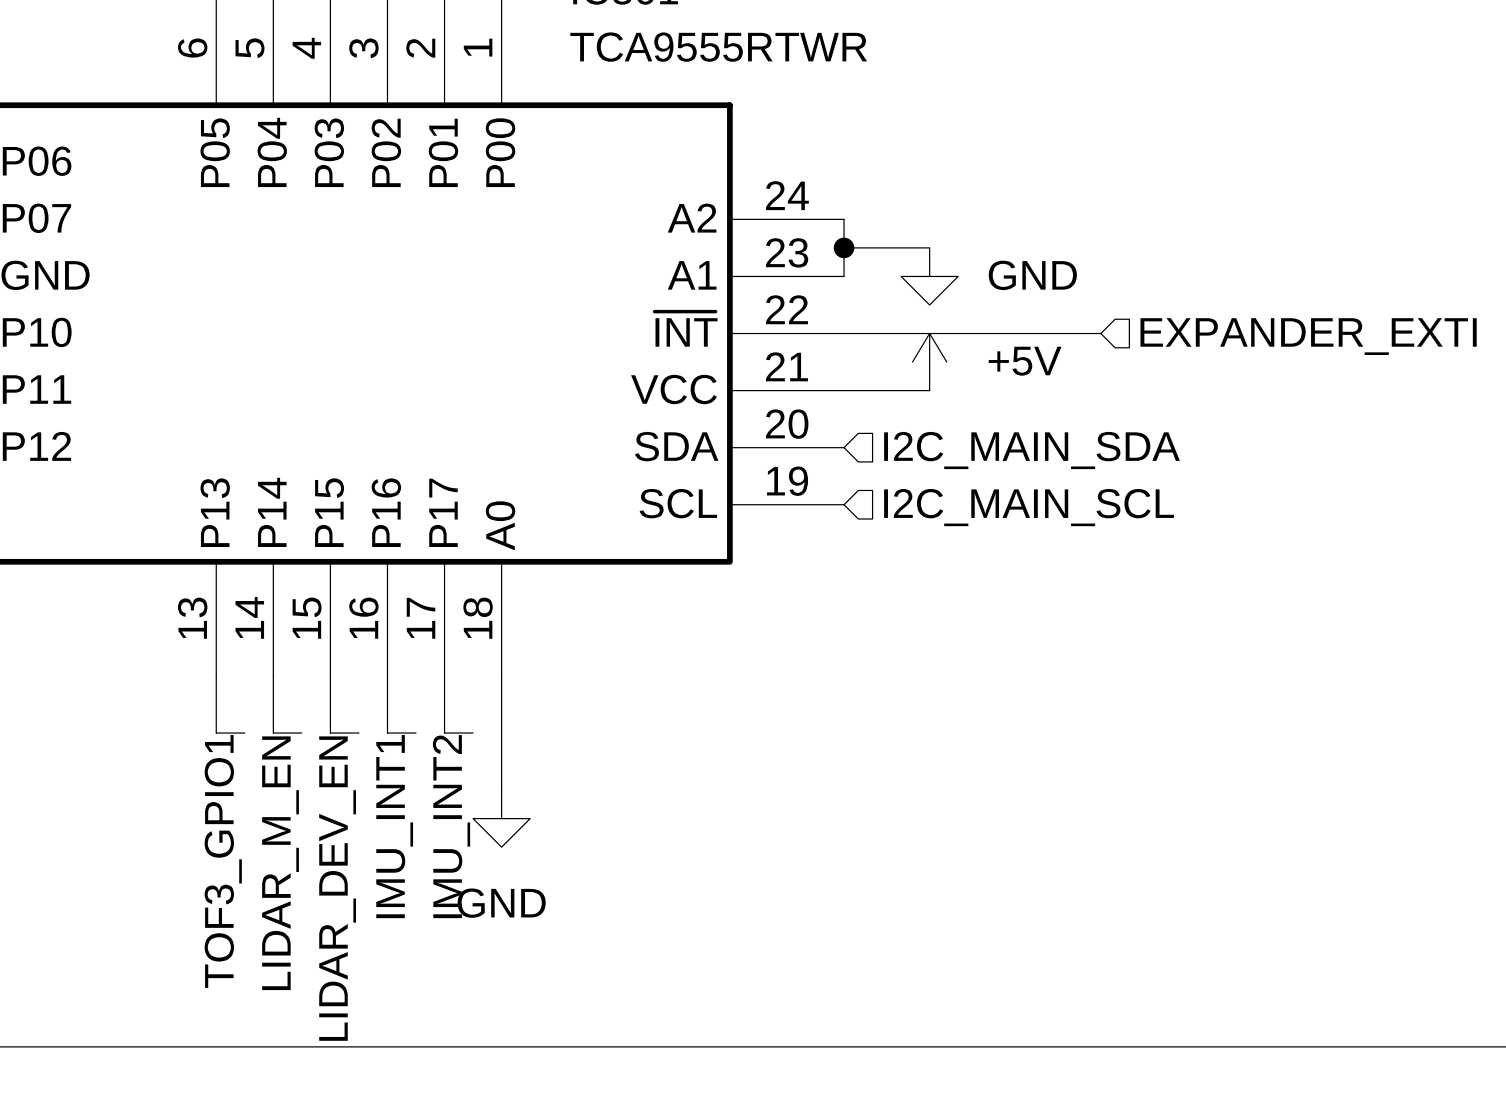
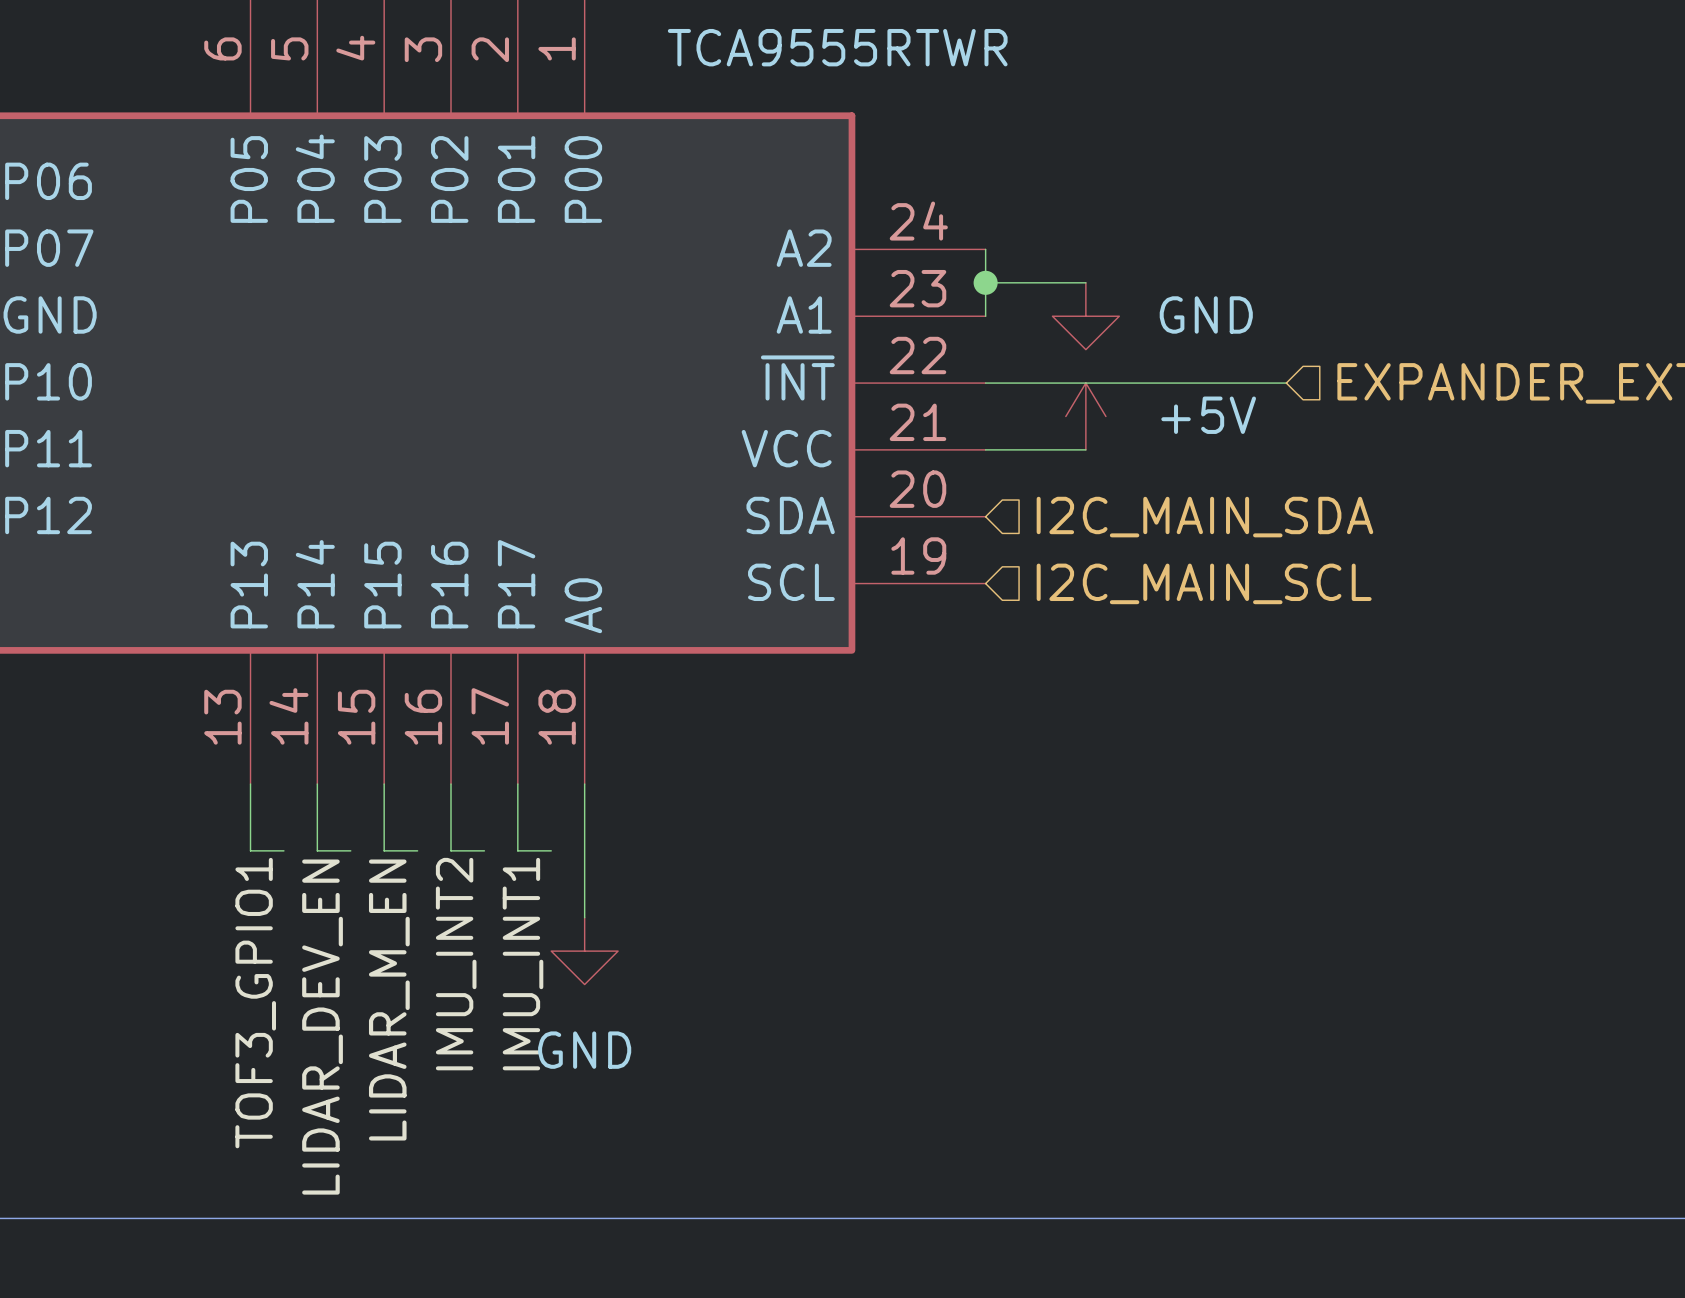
label: IMU_INT1 (394, 826) -> IMU_INT2 (456, 964)
label: IMU_INT2 (451, 826) -> IMU_INT1 (523, 964)
label: LIDAR_M_EN (280, 863) -> LIDAR_DEV_EN (322, 1027)
label: LIDAR_DEV_EN (337, 888) -> LIDAR_M_EN (389, 1000)

